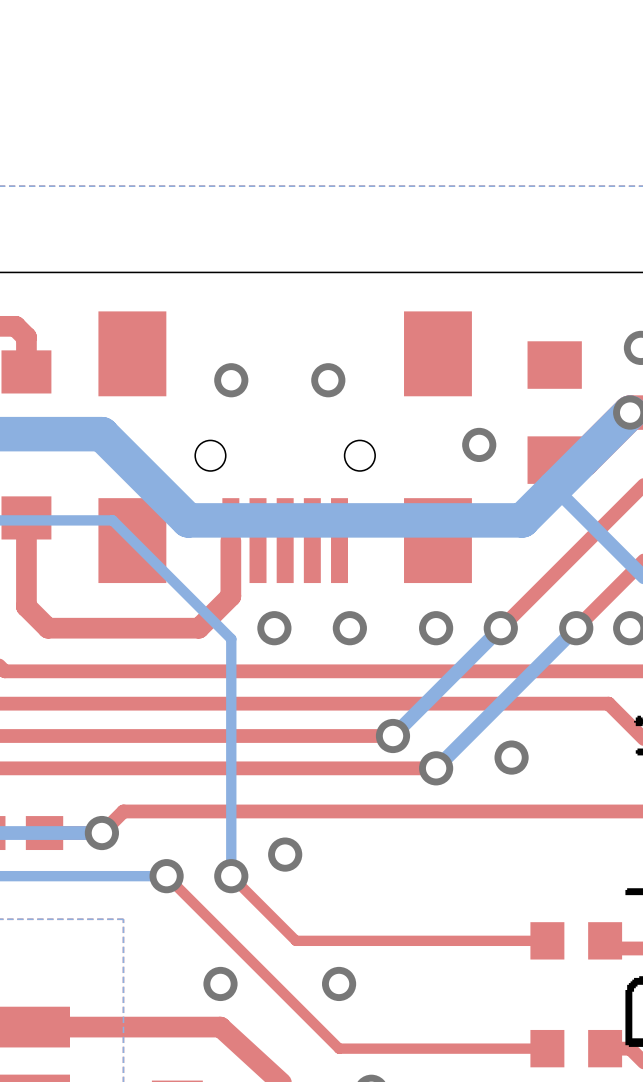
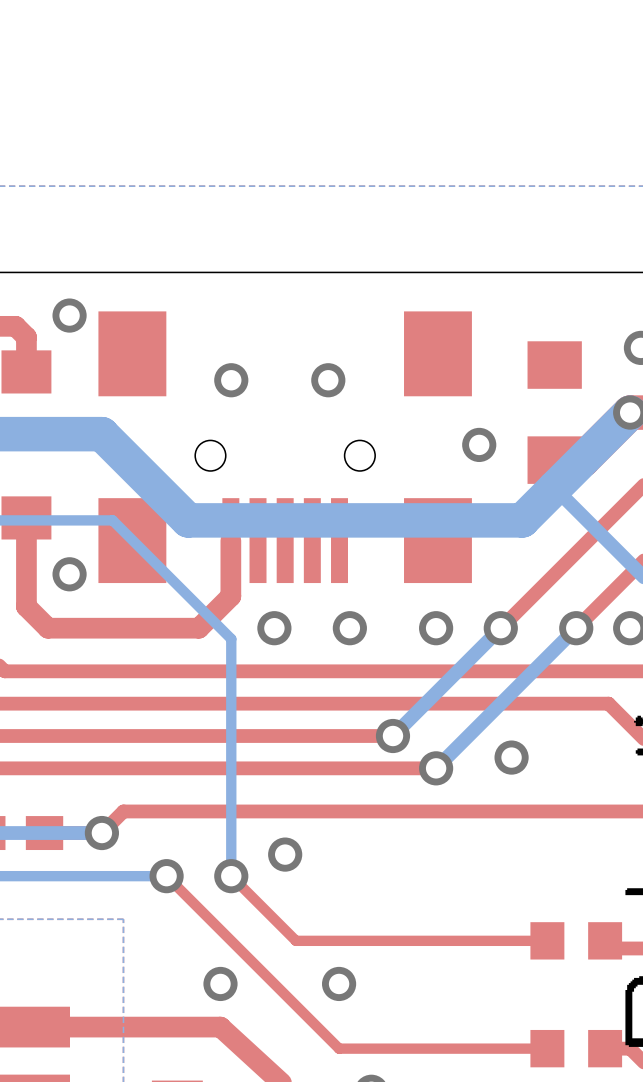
via: none -> (69, 315)
via: none -> (69, 574)

